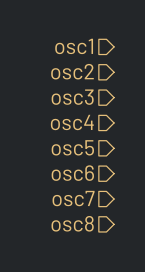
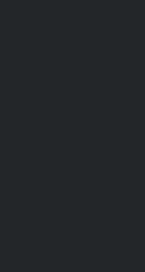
hierarchical label: osc1 (74, 46) -> none
hierarchical label: osc2 (72, 71) -> none
hierarchical label: osc3 (72, 97) -> none
hierarchical label: osc4 (72, 122) -> none
hierarchical label: osc5 (72, 147) -> none
hierarchical label: osc6 (72, 173) -> none
hierarchical label: osc7 (73, 198) -> none
hierarchical label: osc8 (72, 223) -> none

